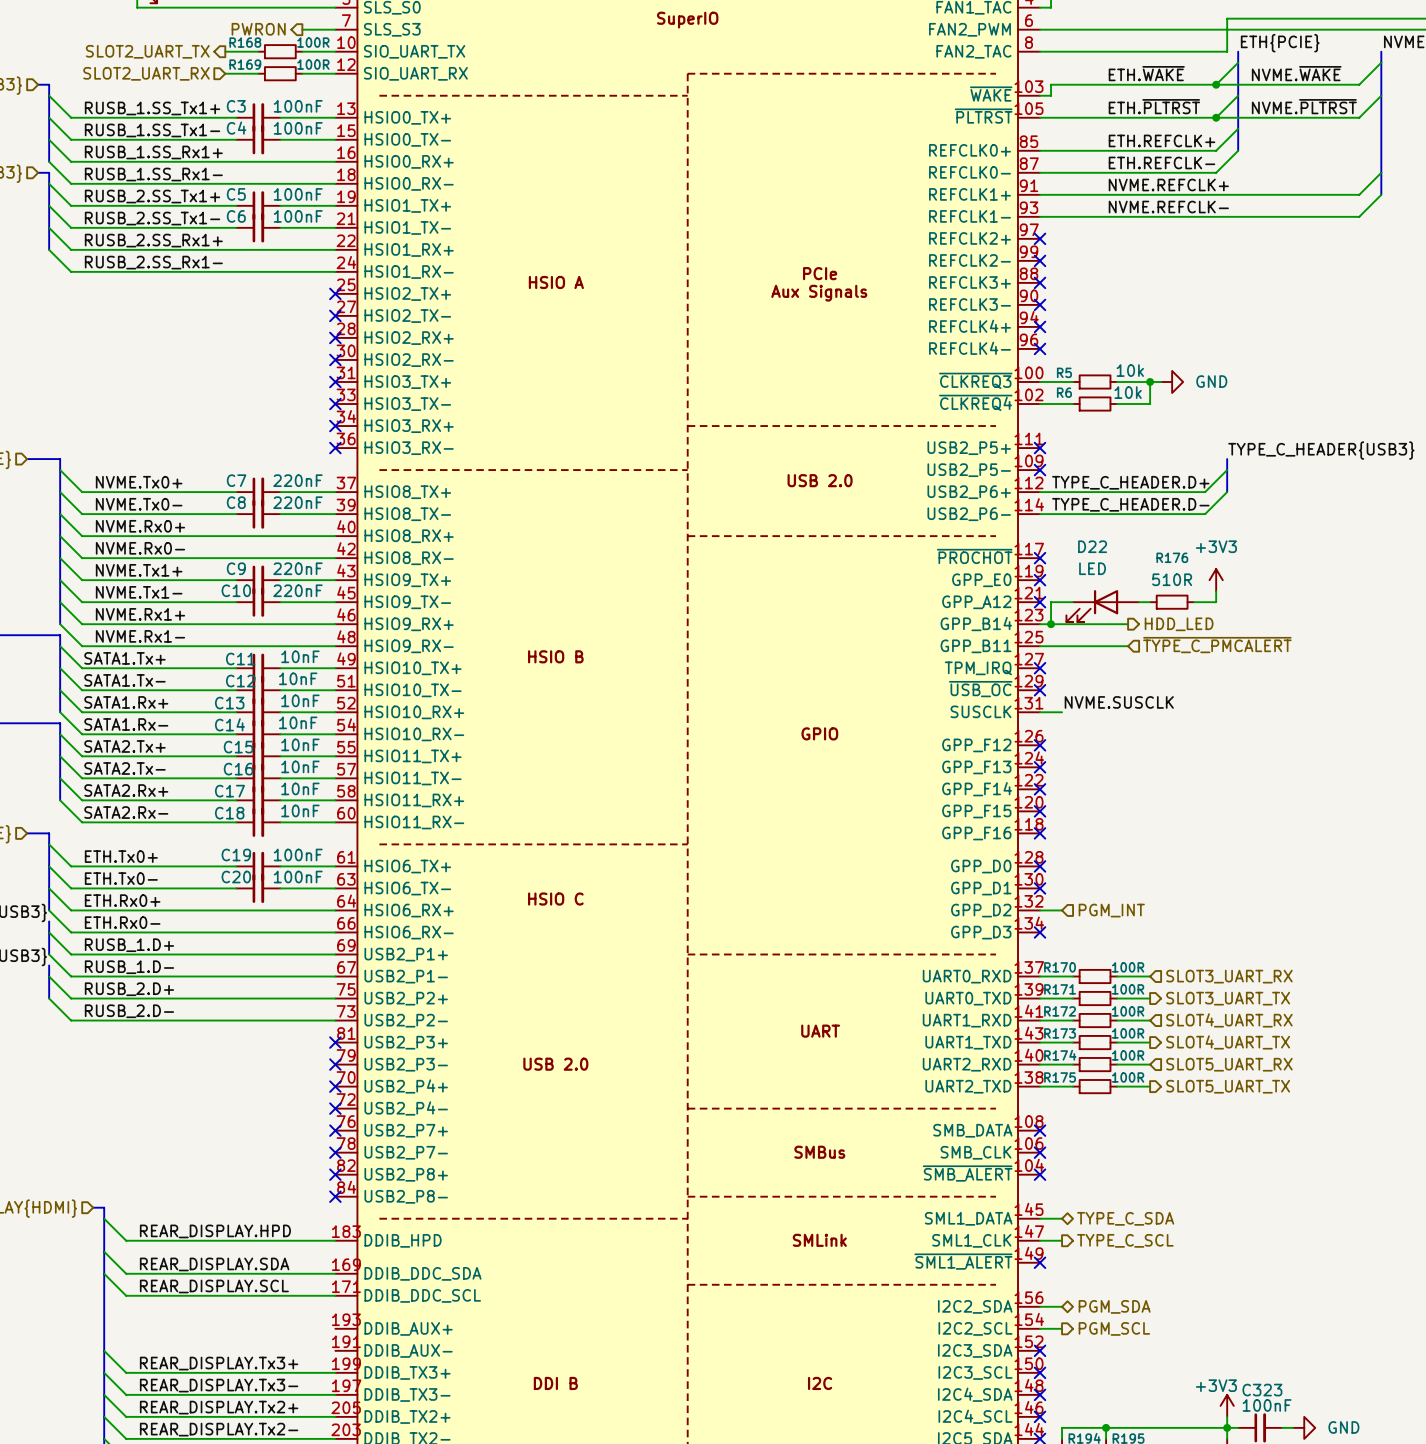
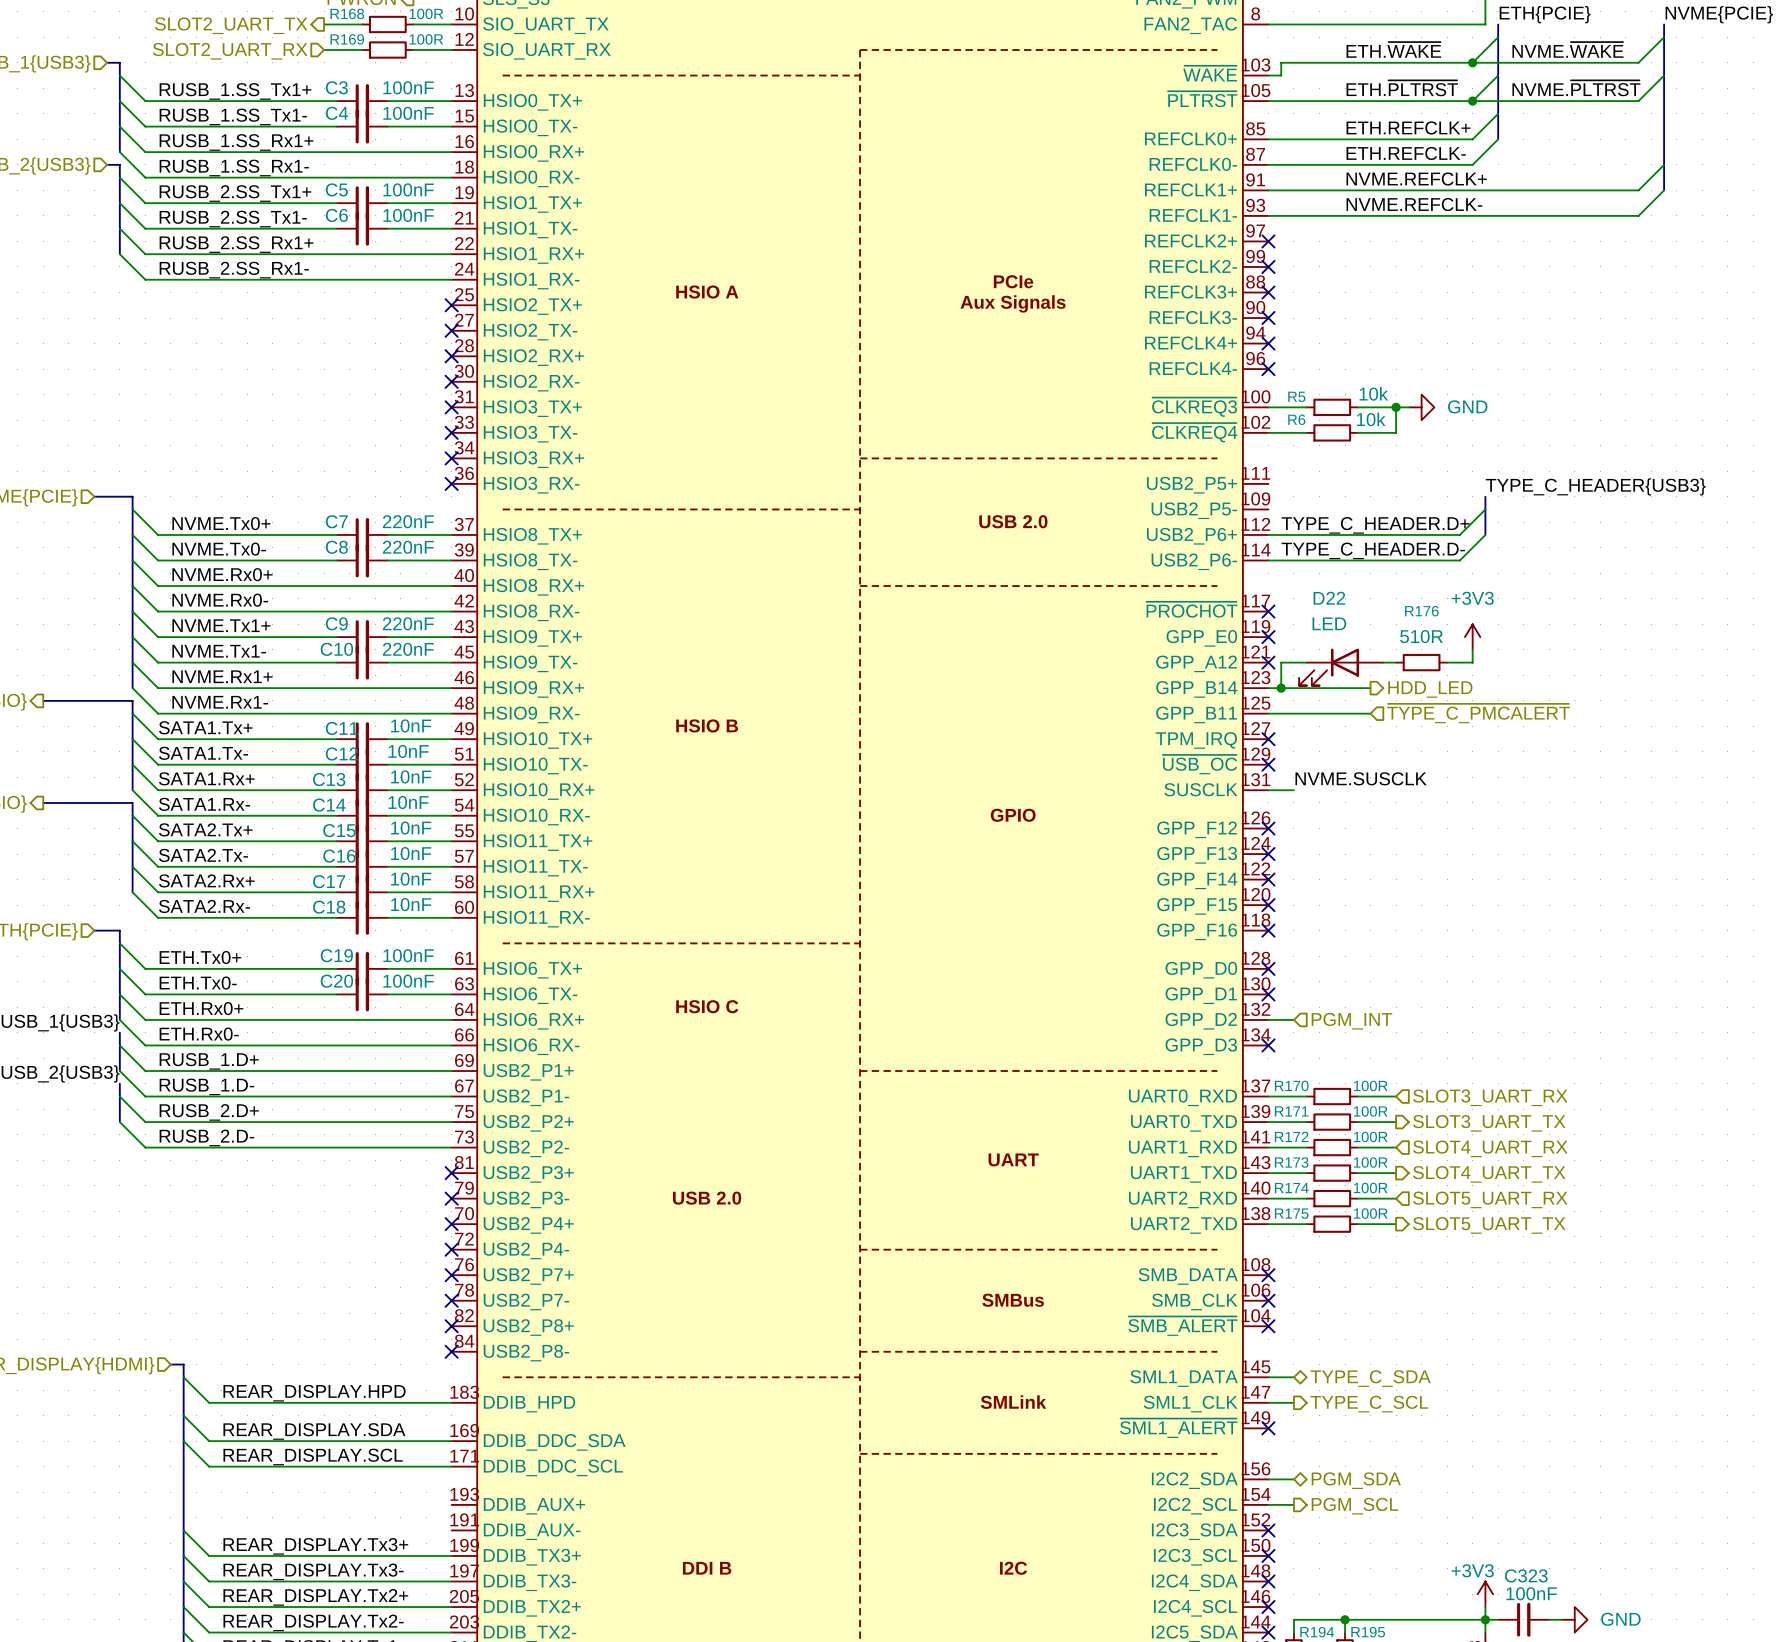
no-connect mark: (1040, 448) -> none
no-connect mark: (1040, 470) -> none

